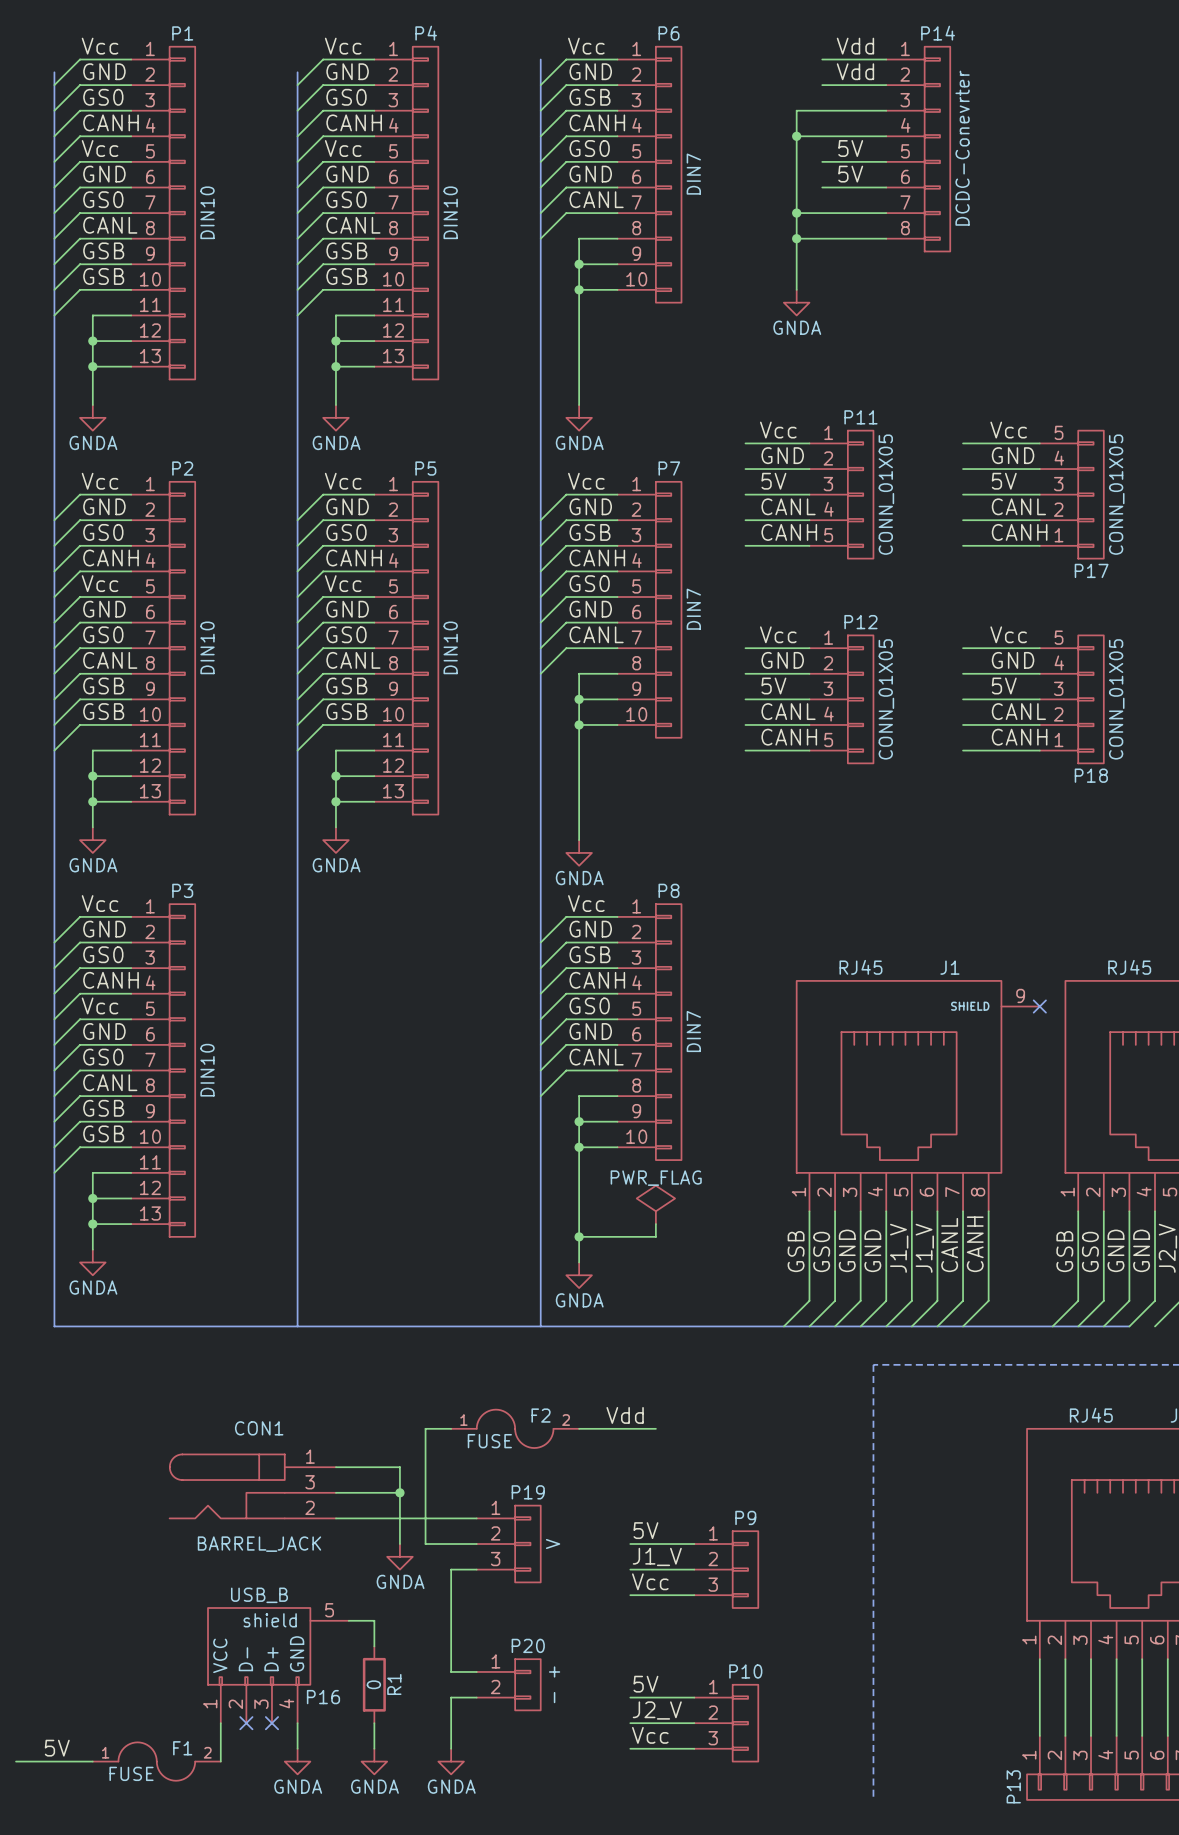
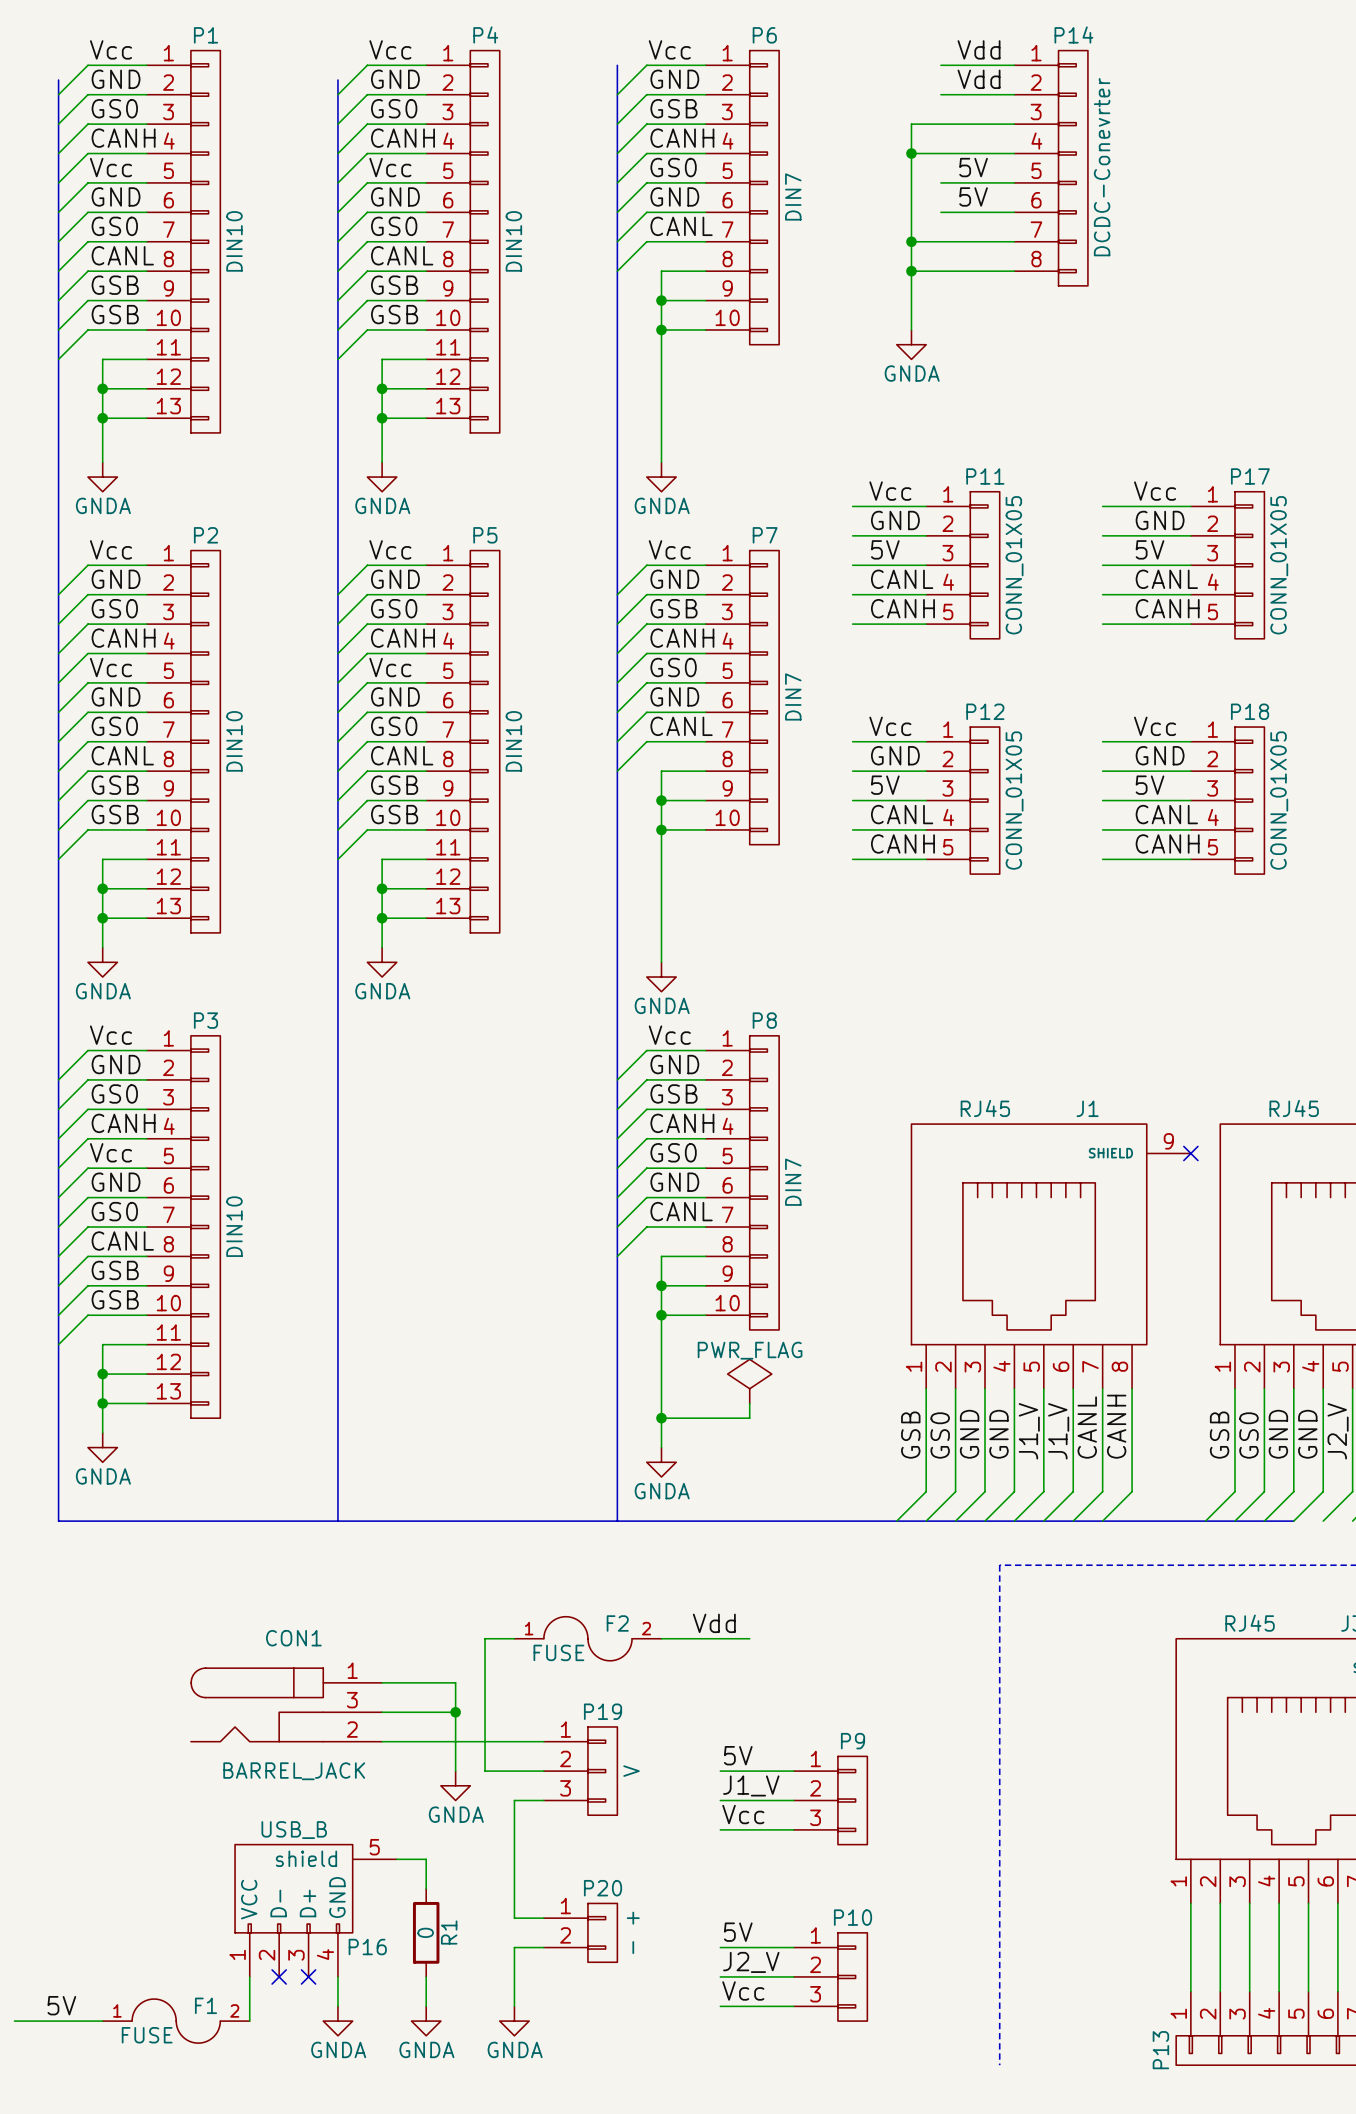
P17 flip: as is (1091, 494) -> up-down (1249, 565)
P18 flip: as is (1091, 699) -> up-down (1249, 800)

